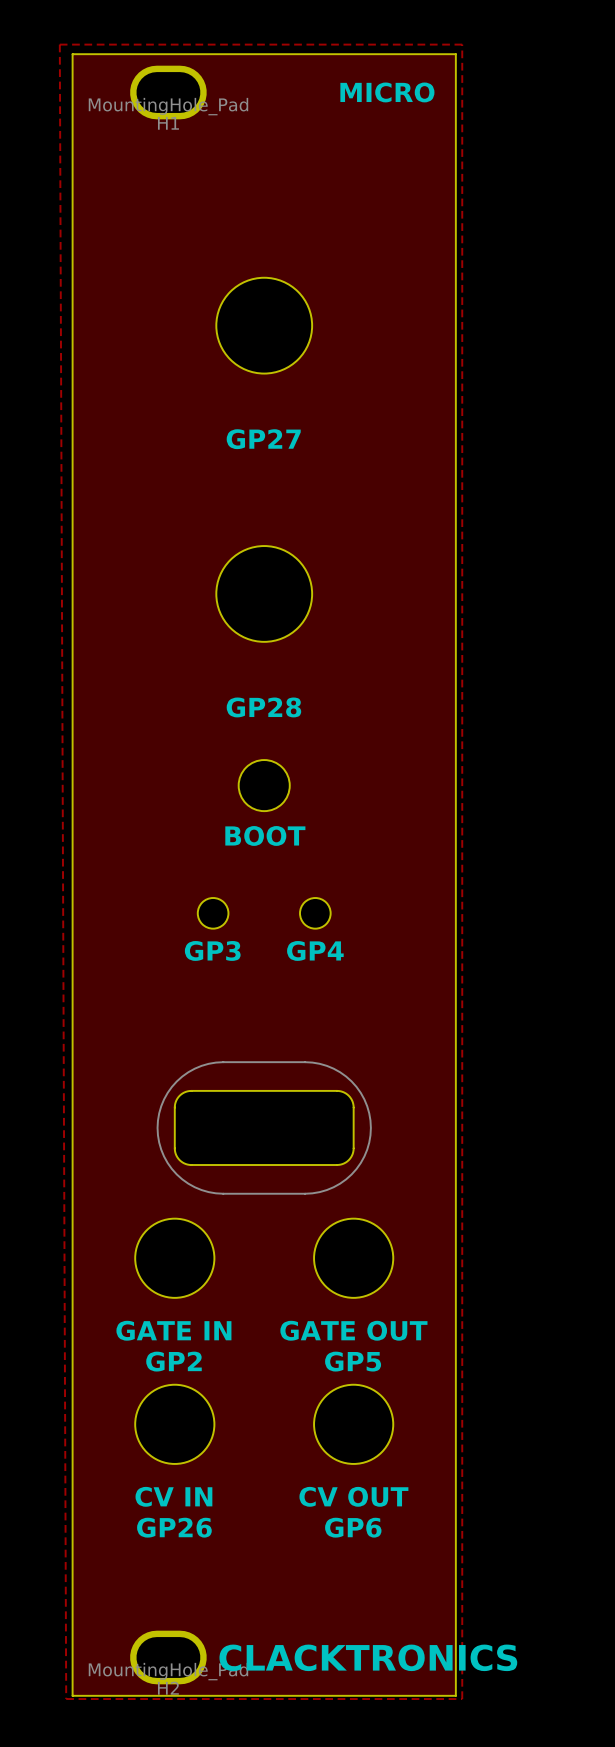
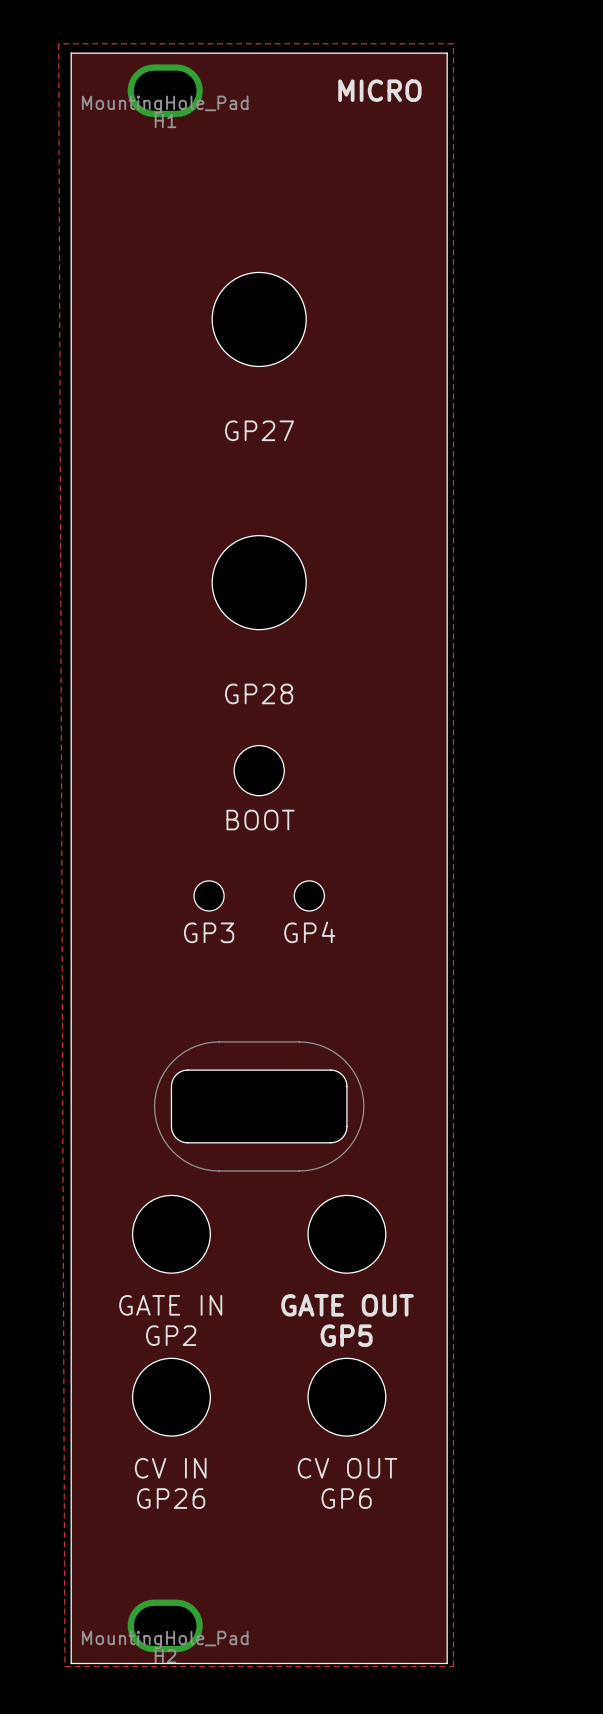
text: CLACKTRONICS (368, 1657) -> none

